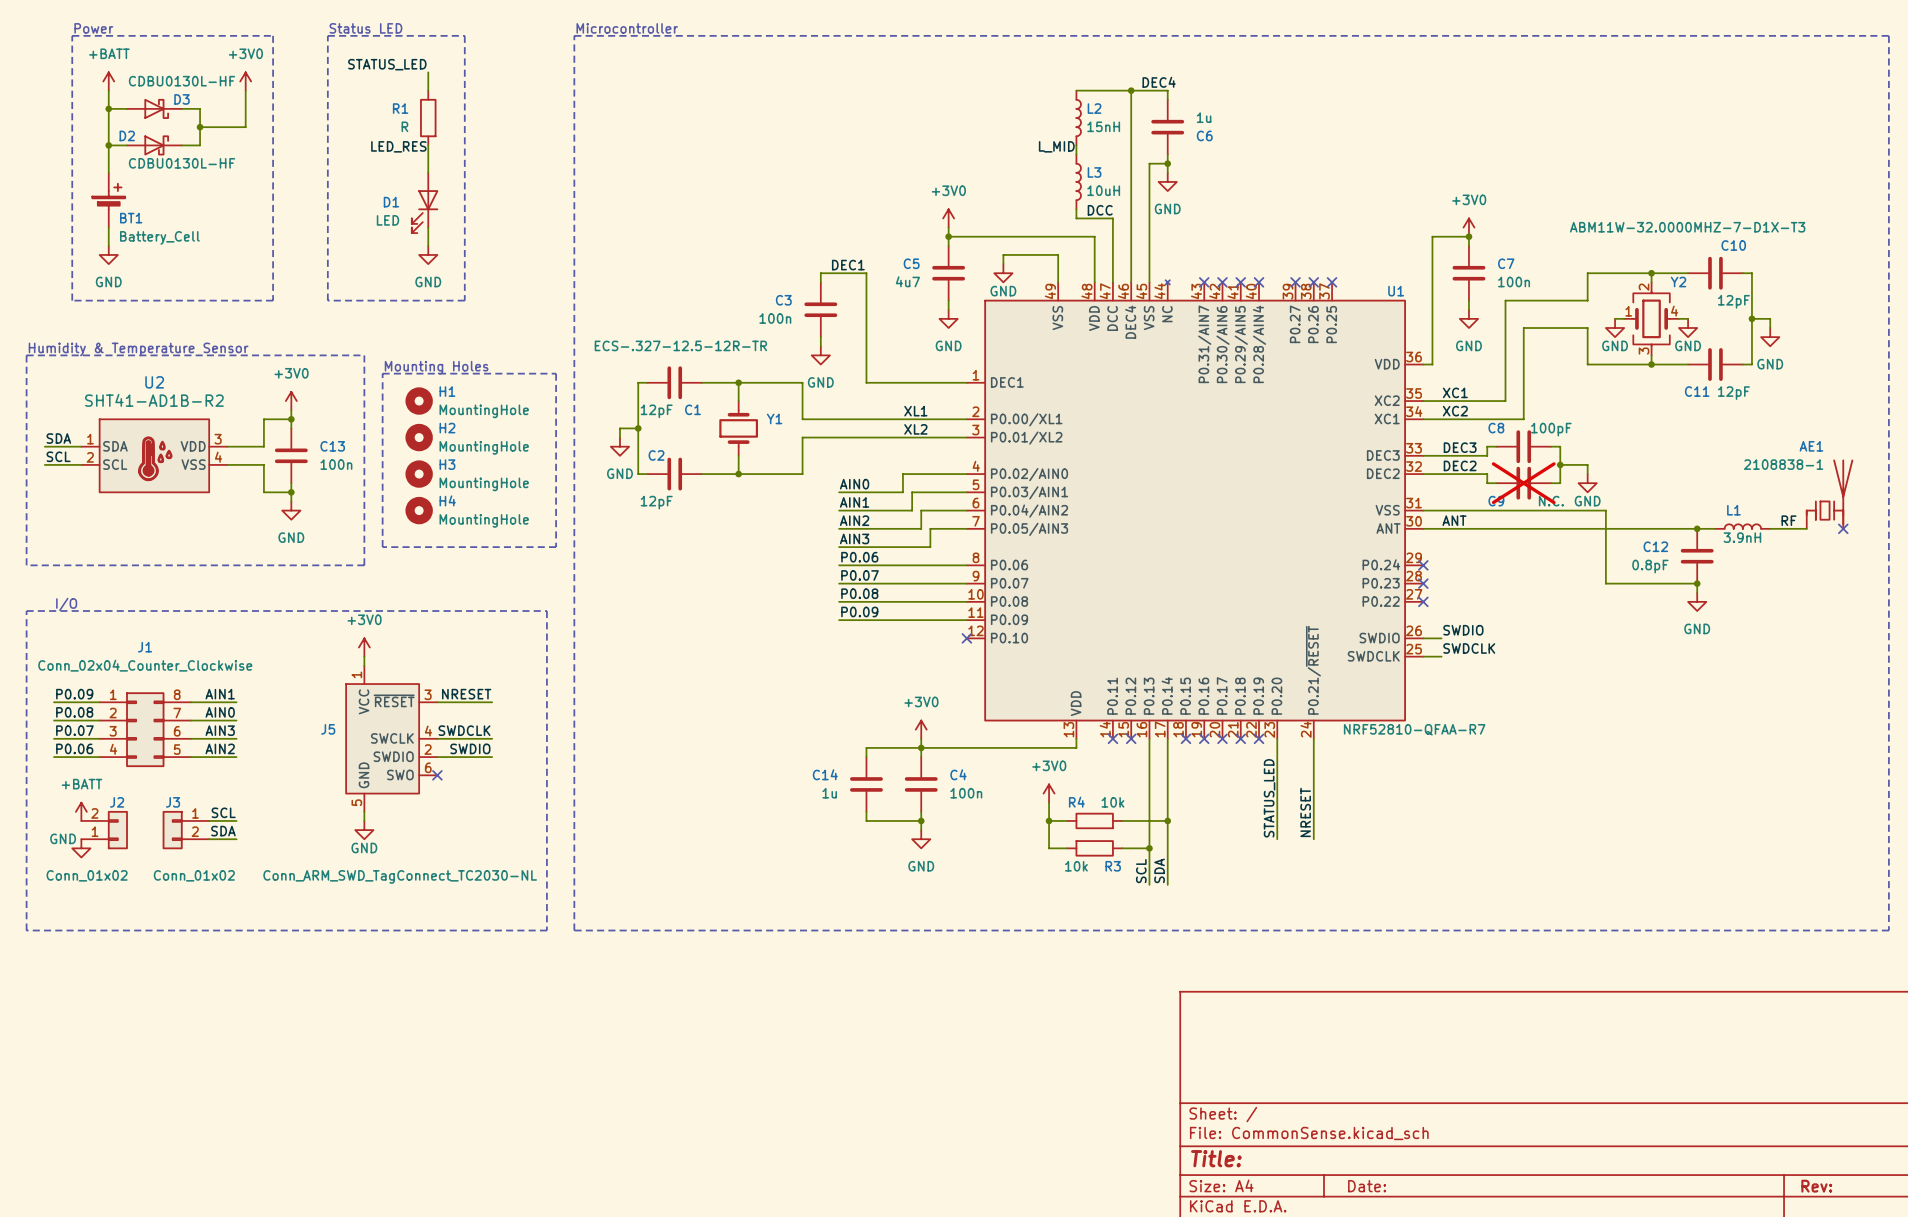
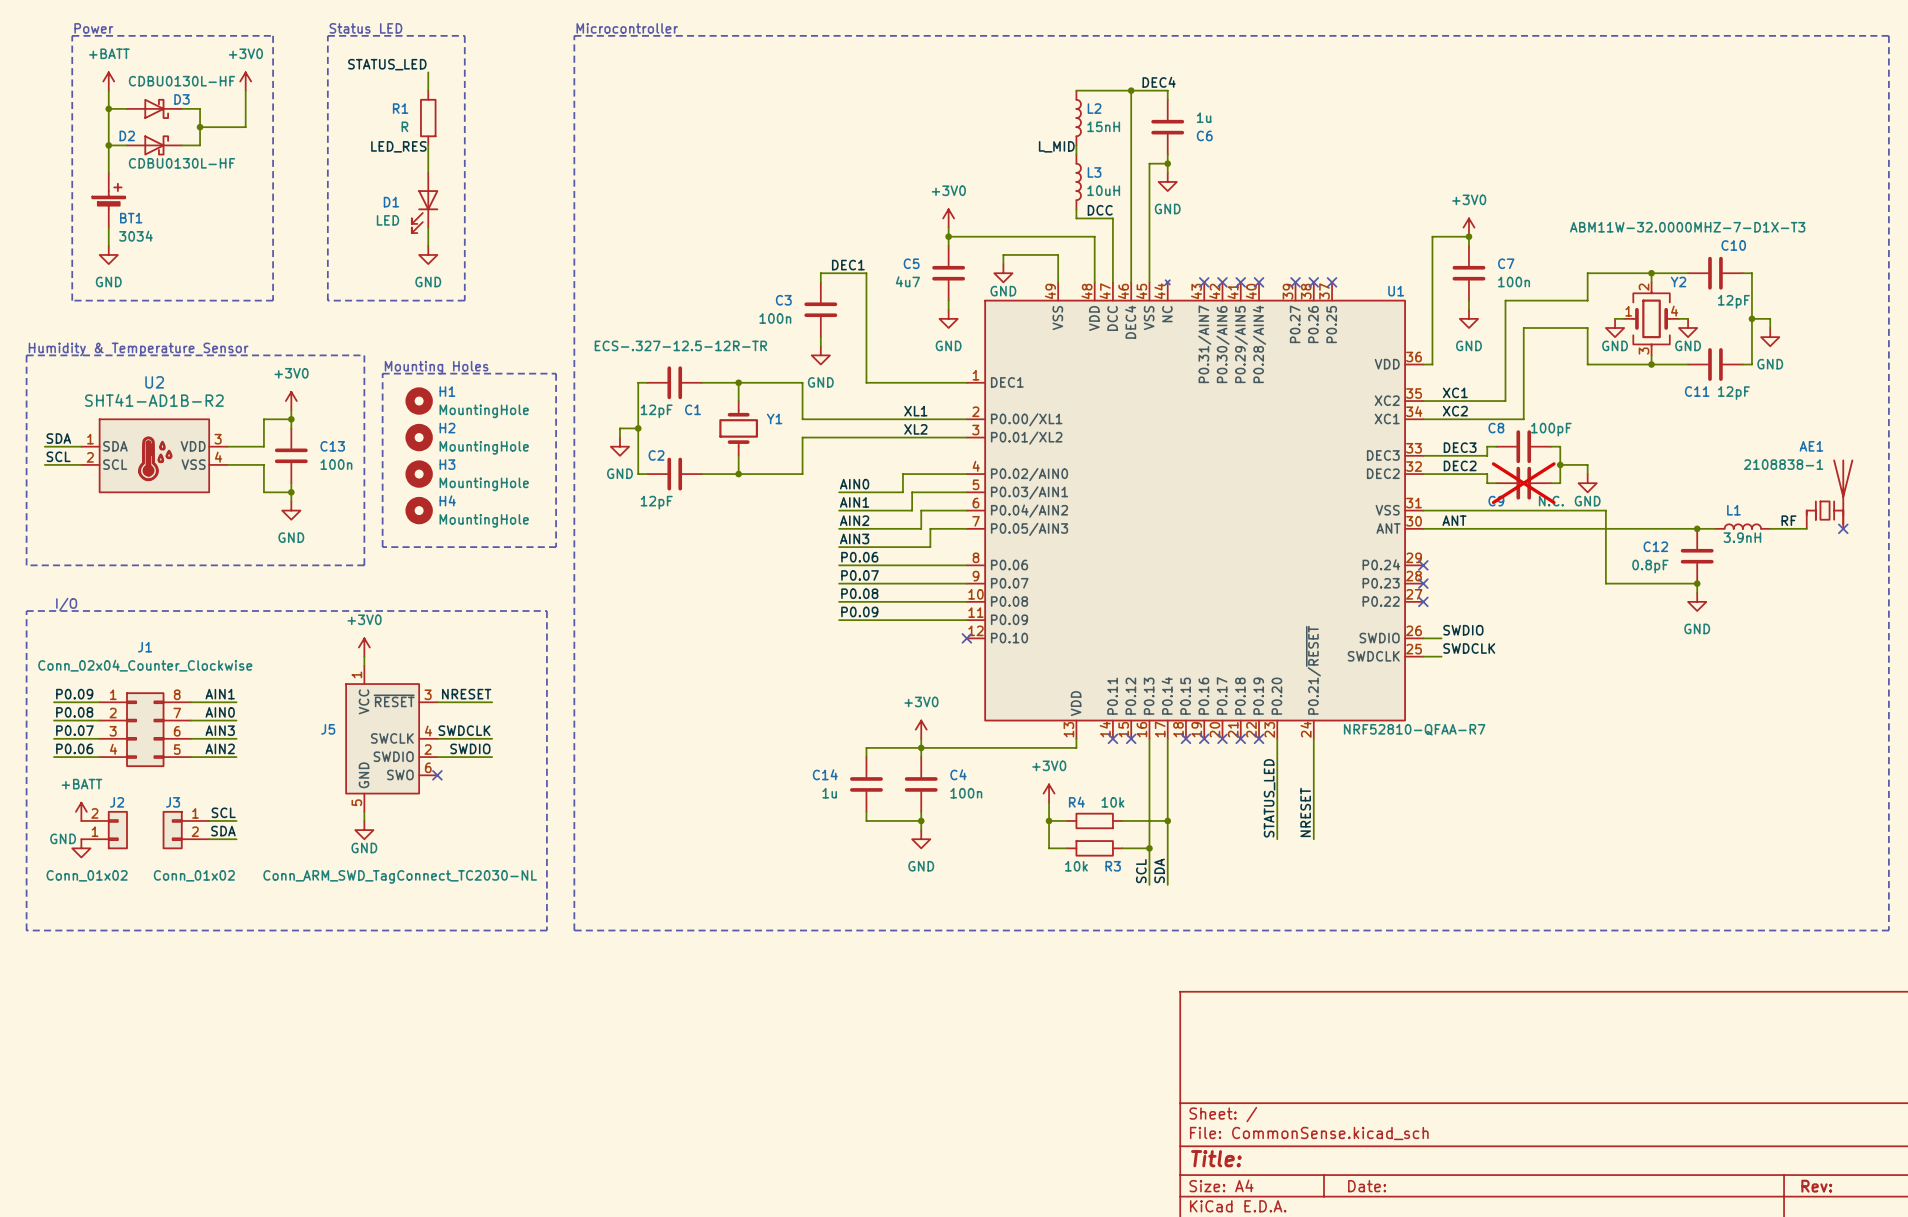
BT1 value: Battery_Cell (159, 237) -> 3034 (135, 236)

